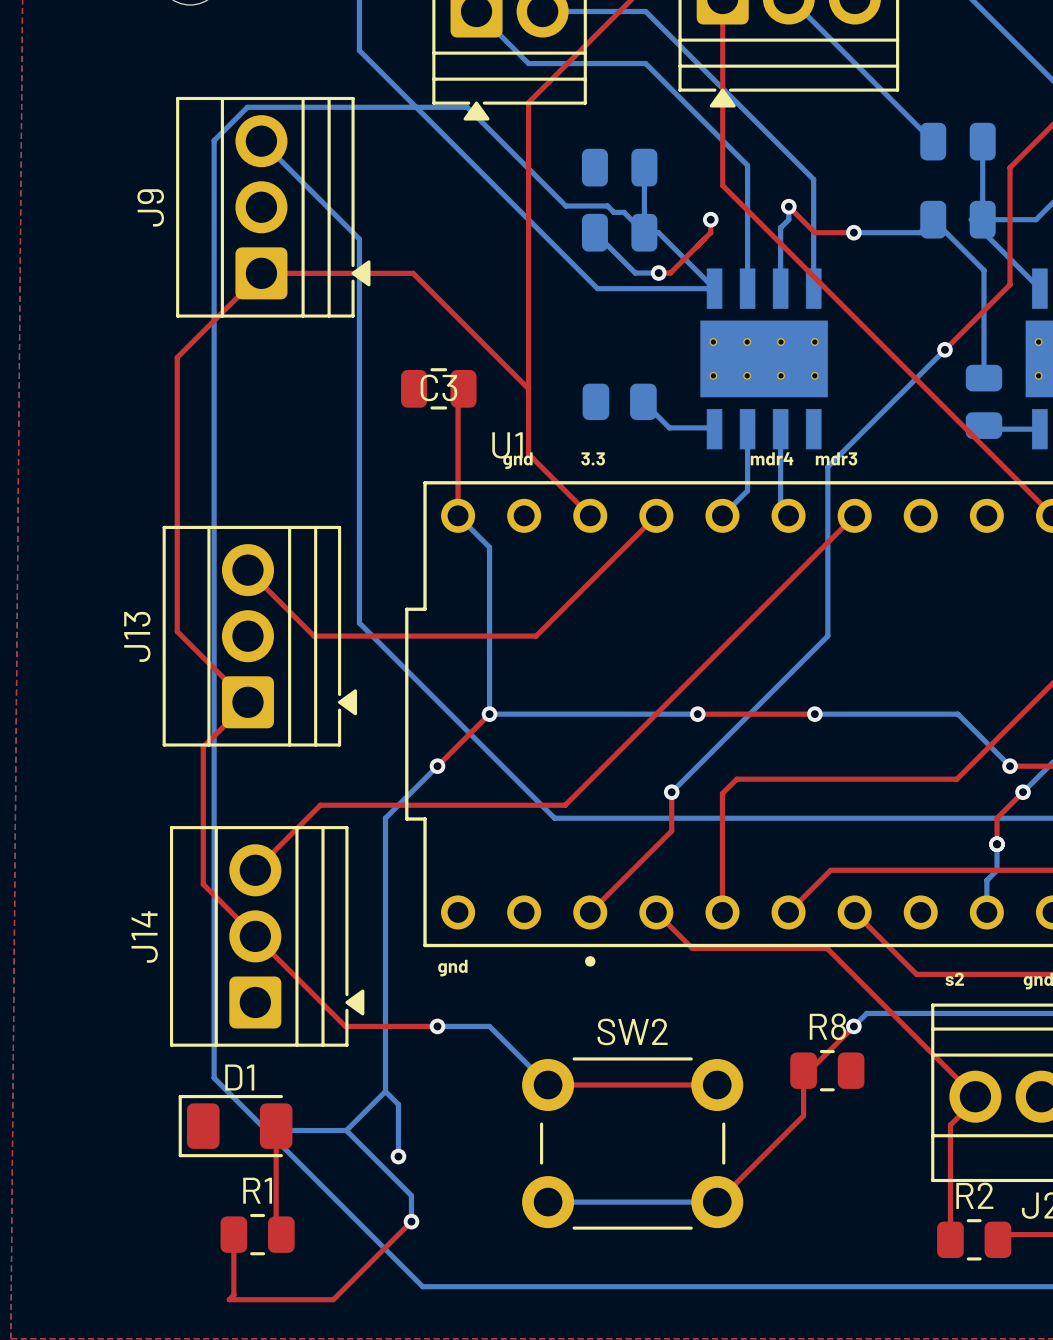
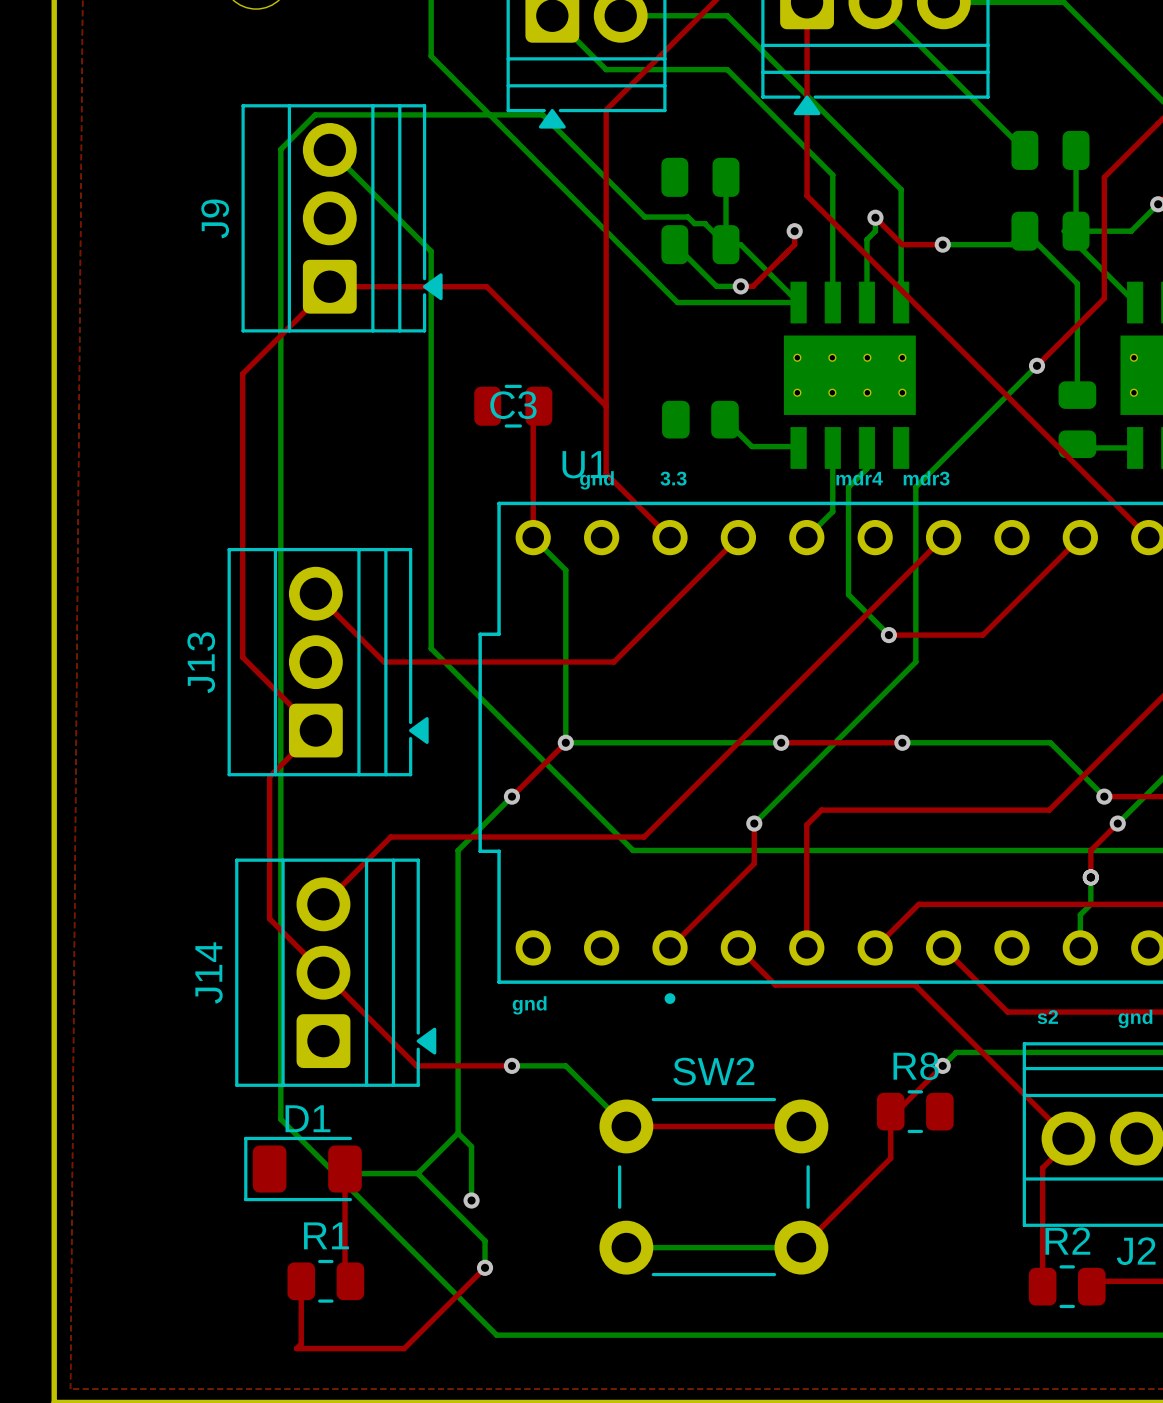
bottom track: (780, 449) (780, 507) -> (866, 468) (848, 487) (848, 594) (888, 635)
top track: none -> (1080, 537) (982, 635) (888, 635)
via: none -> (888, 635)

